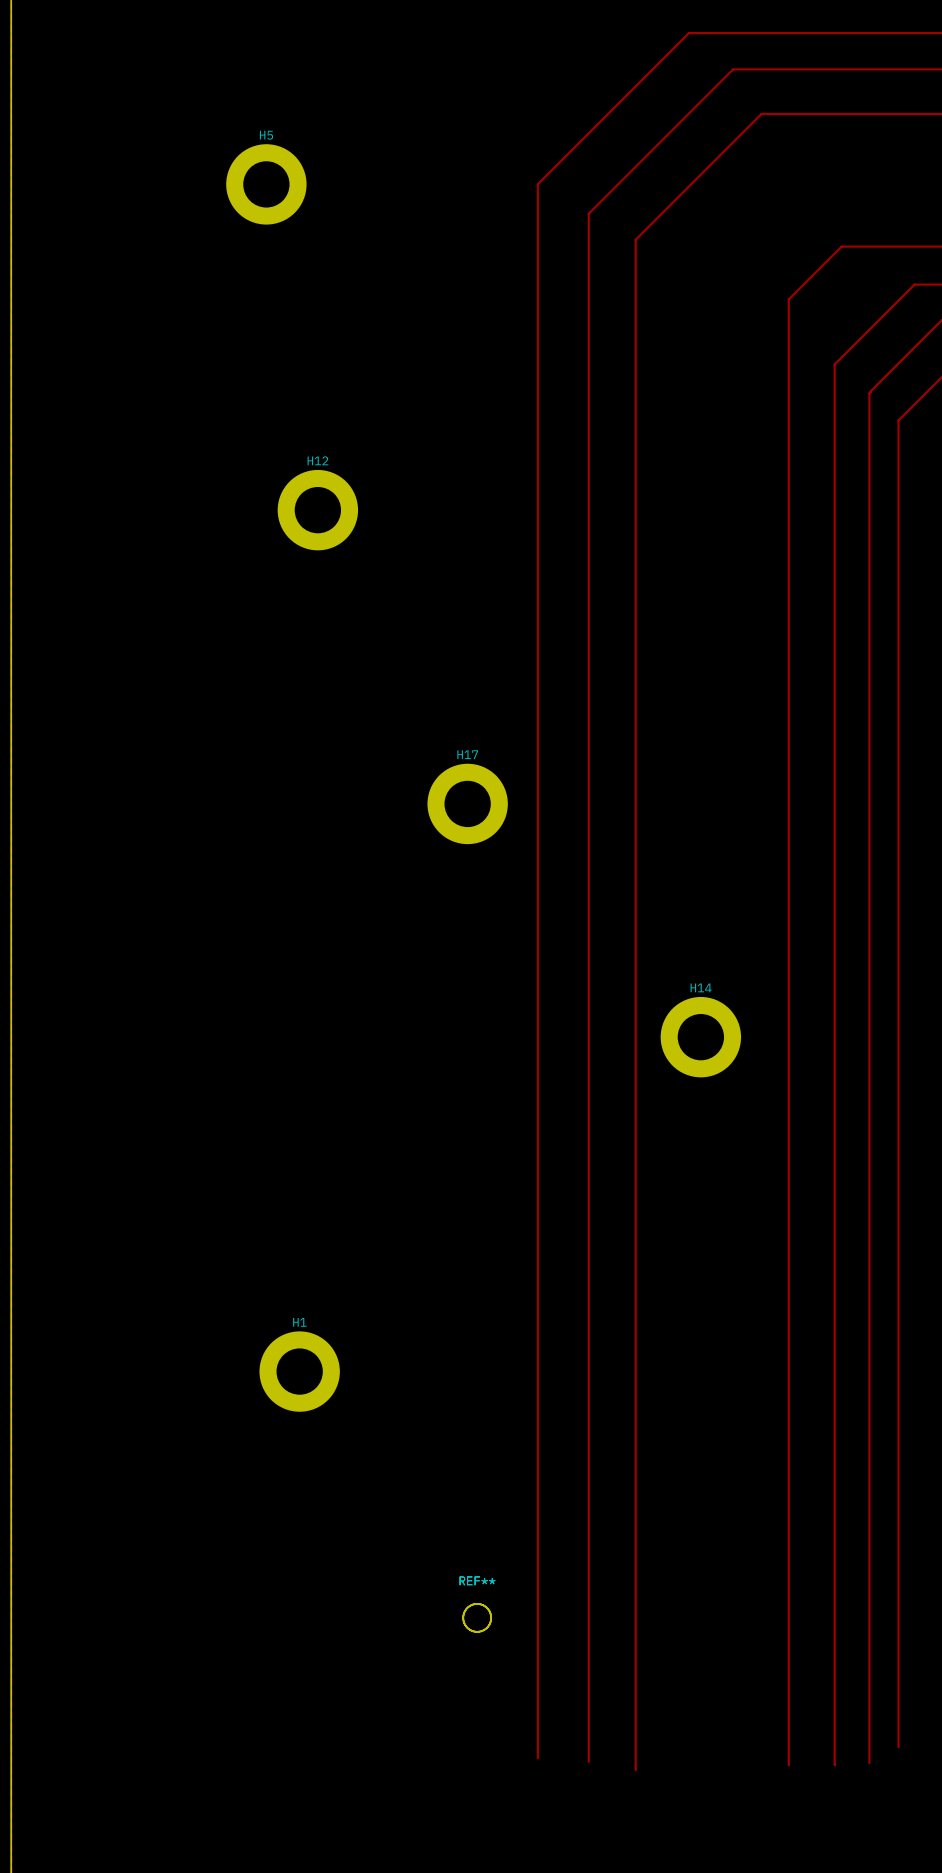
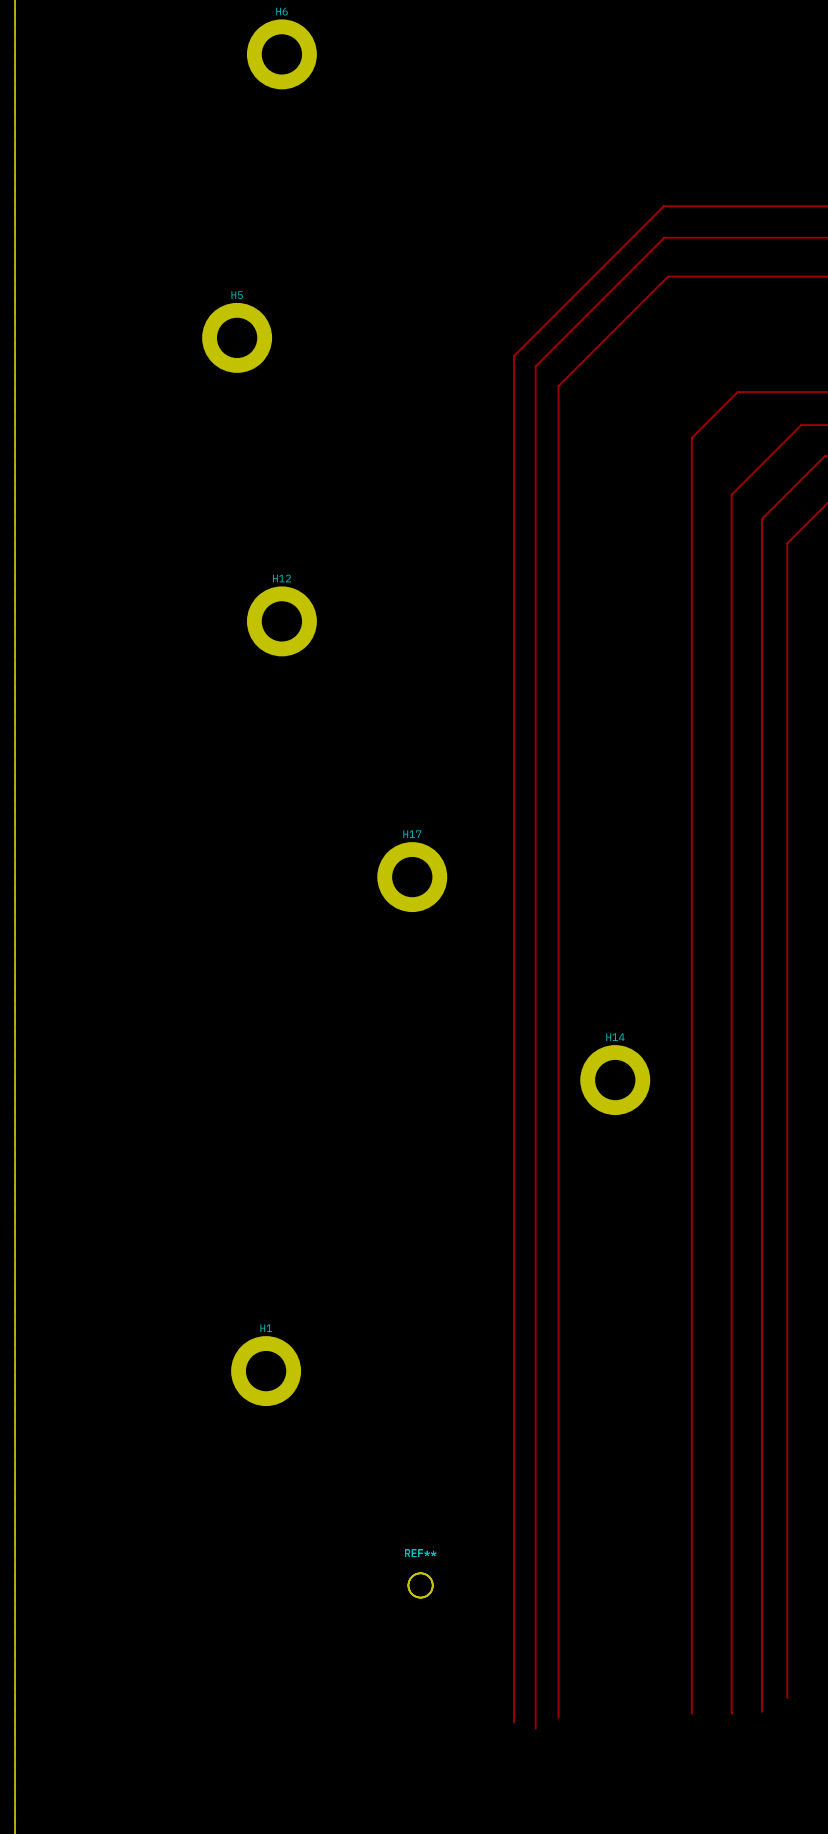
track: (756, 33) (688, 33) (537, 184) (537, 1758) -> (663, 206) (514, 355) (514, 1722)
track: (757, 69) (733, 69) (588, 213) (588, 1761) -> (664, 237) (535, 366) (535, 1728)

